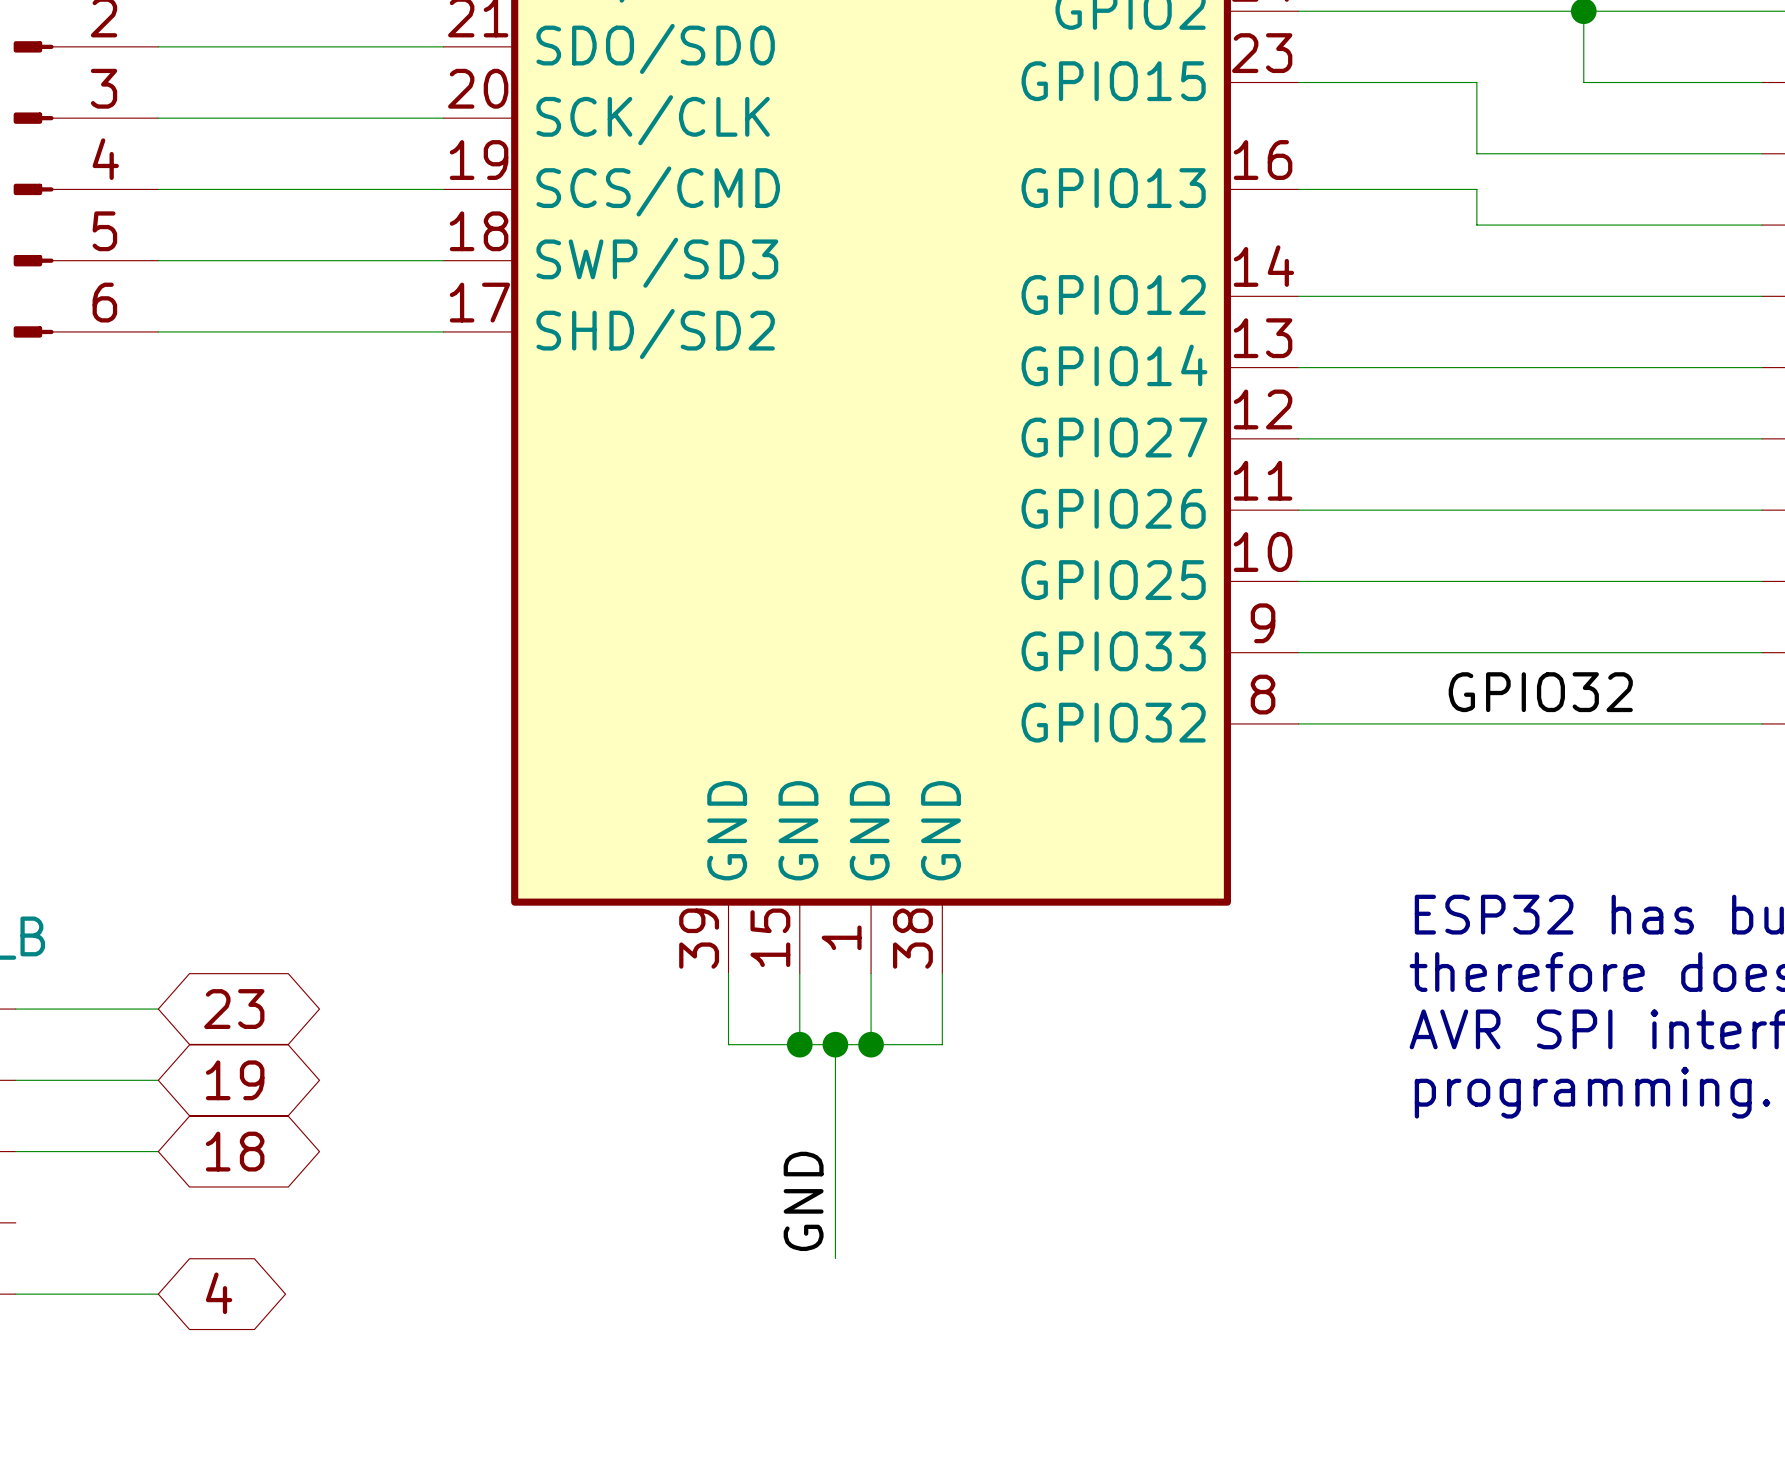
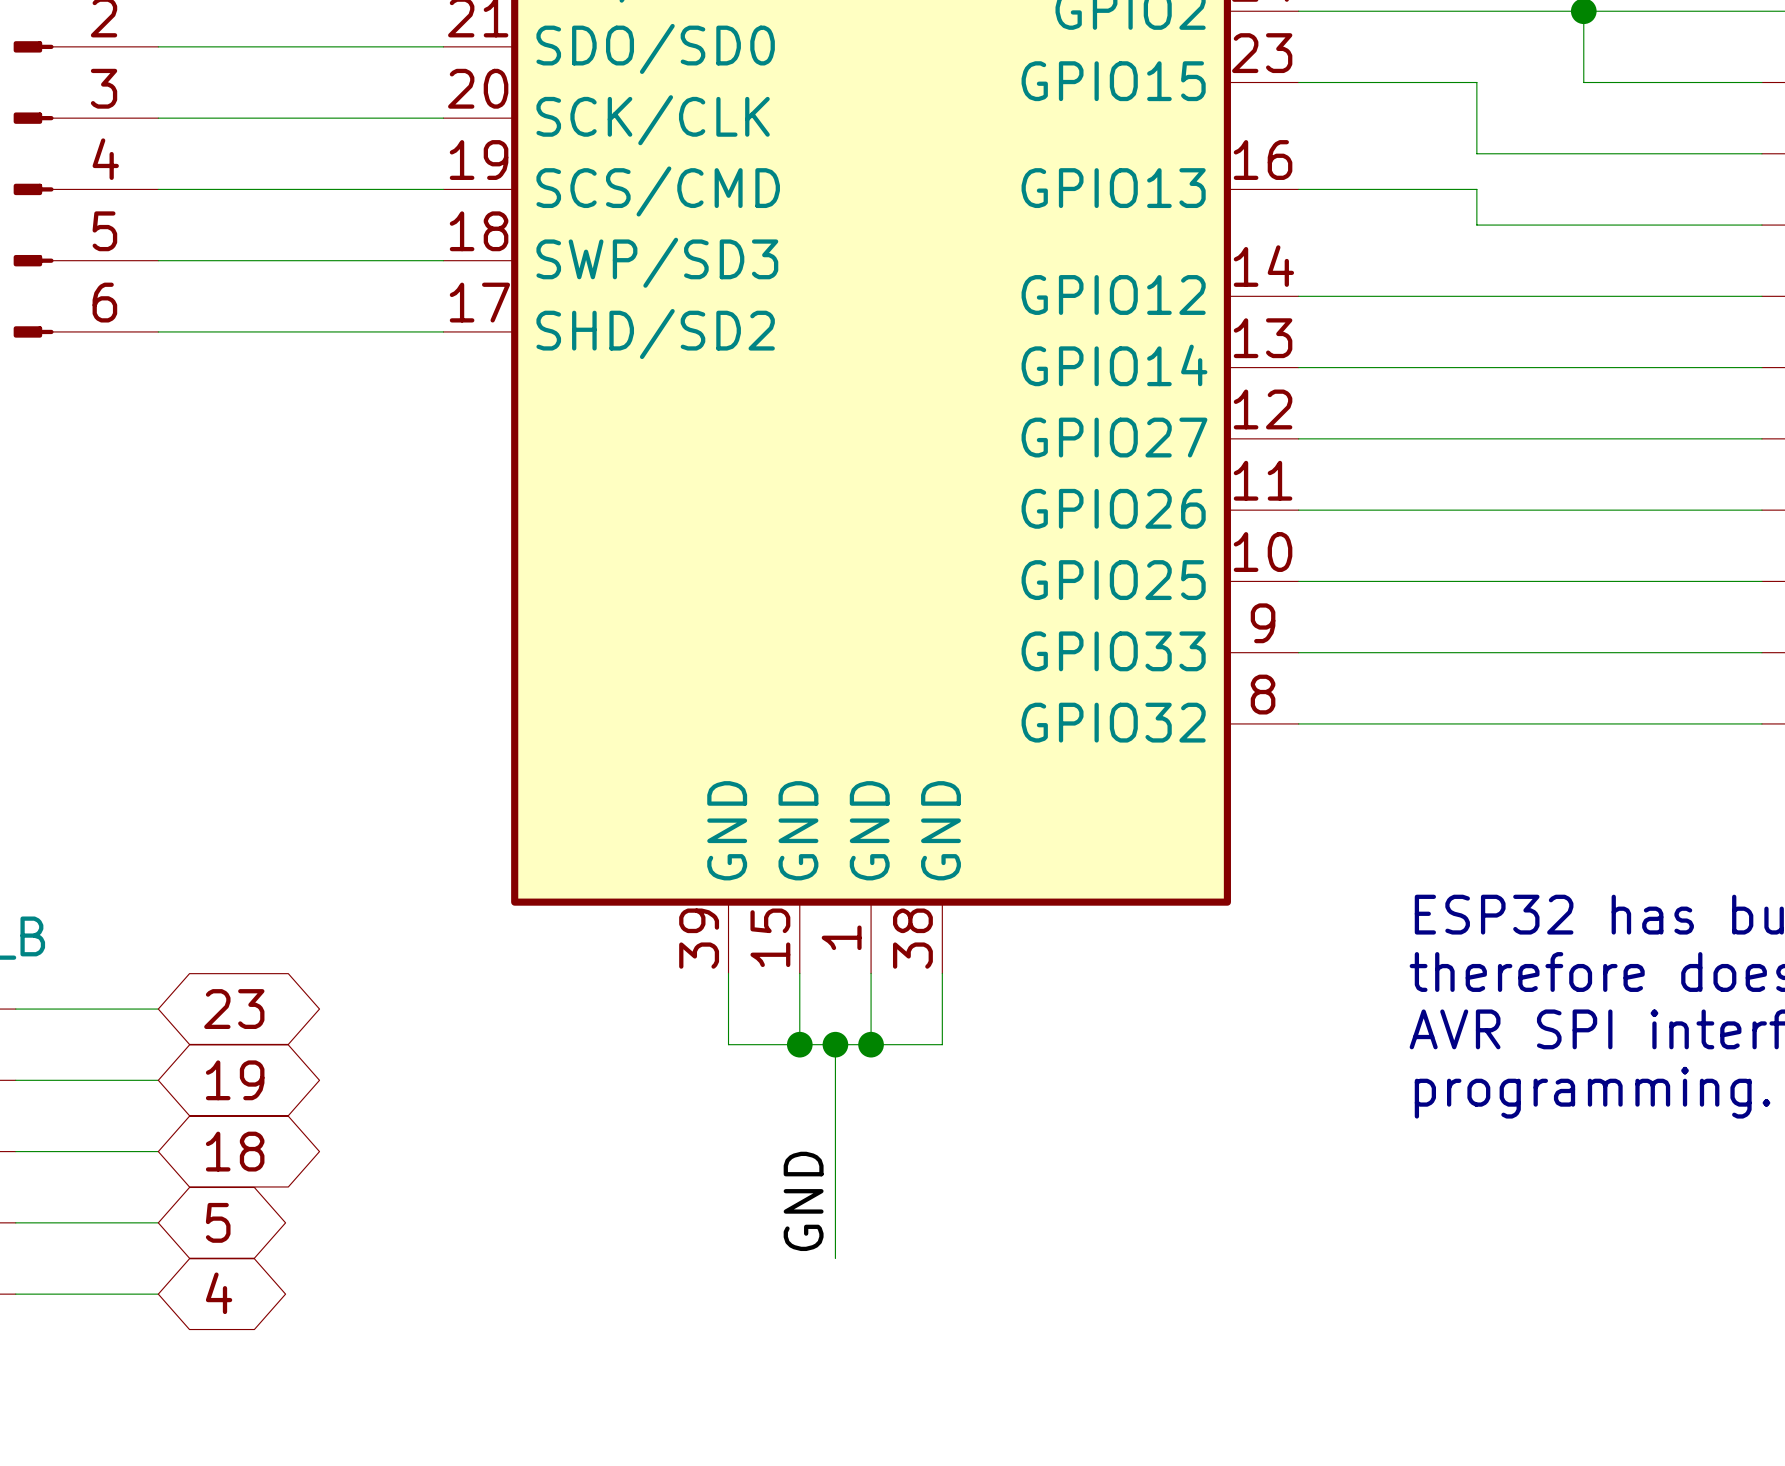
label: GPIO32 (1540, 692) -> none
wire: none -> (15, 1222) (158, 1222)
global label: none -> 5 (218, 1222)

